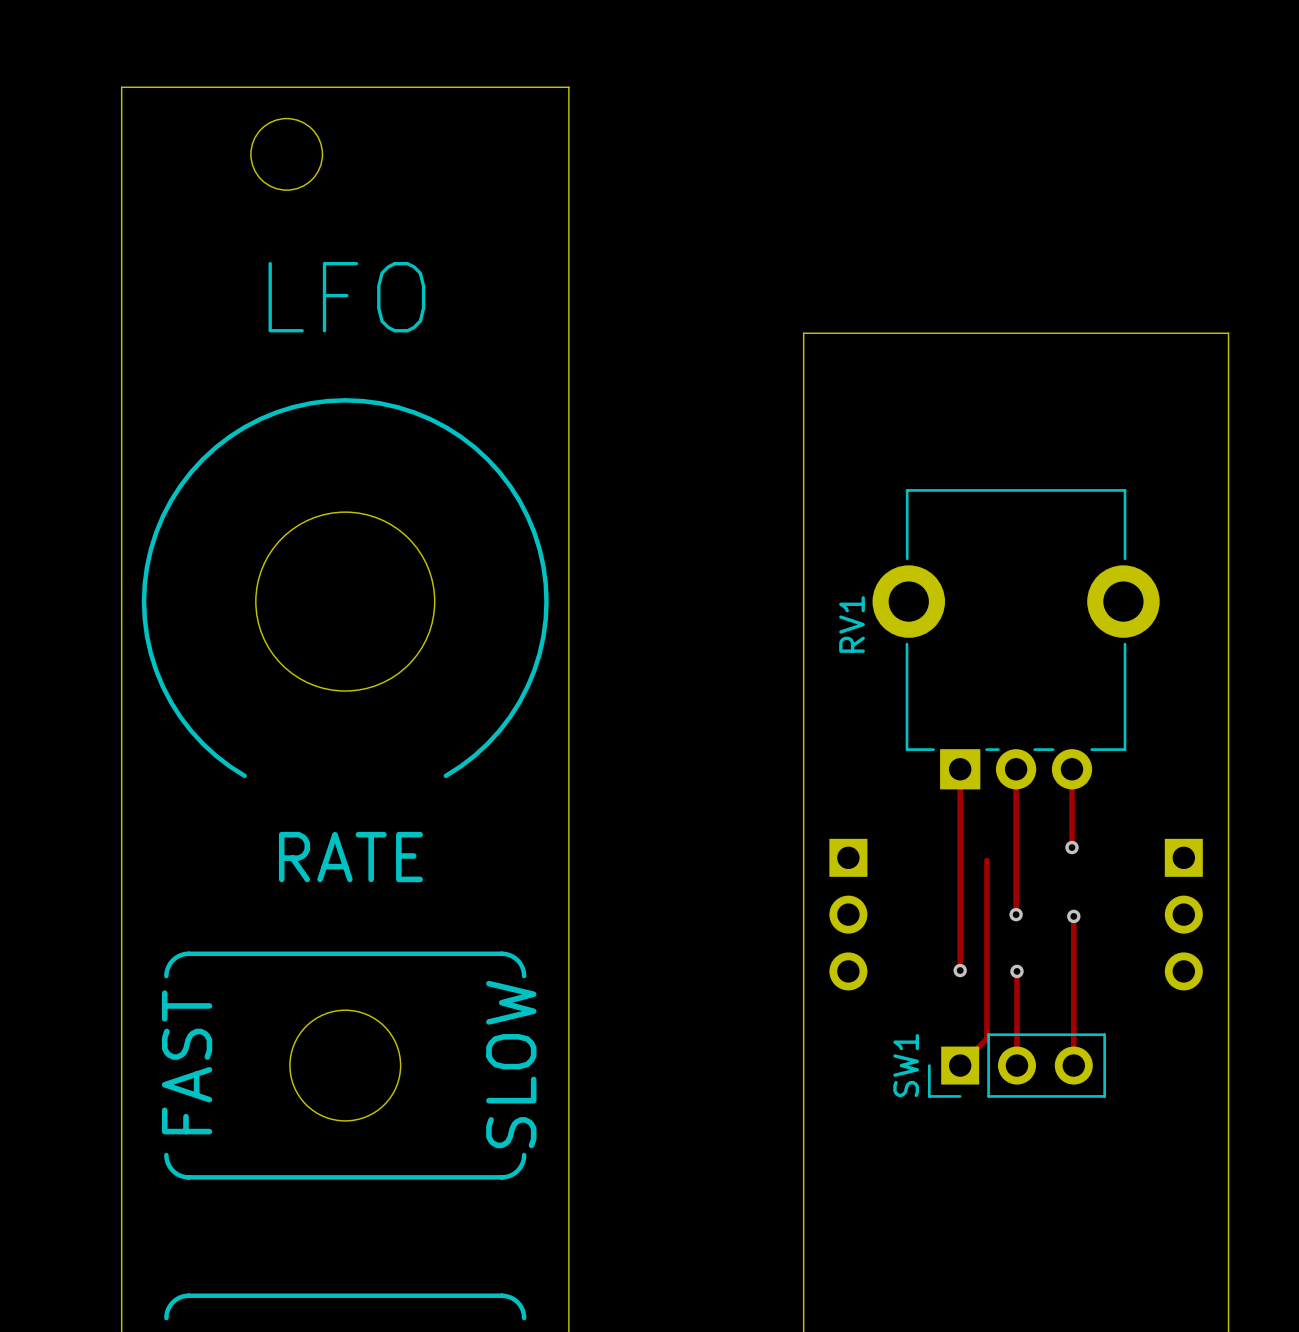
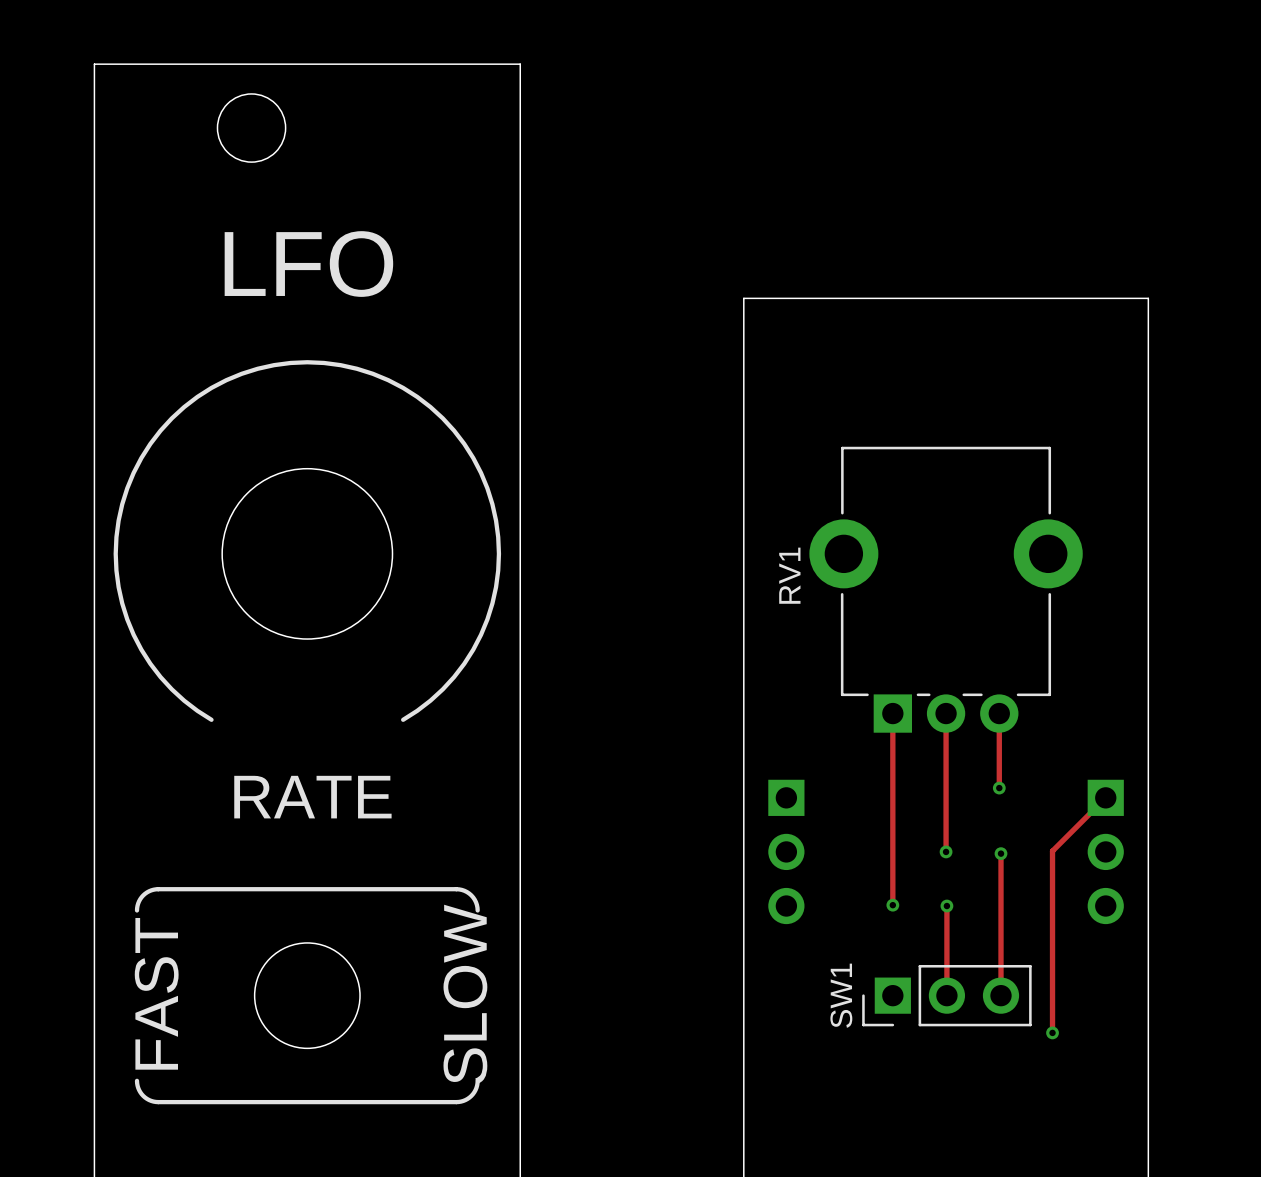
track: none -> (1105, 797) (1052, 851) (1052, 1032)
track: (986, 860) (986, 1038) (960, 1065) -> none
via: none -> (1052, 1032)

